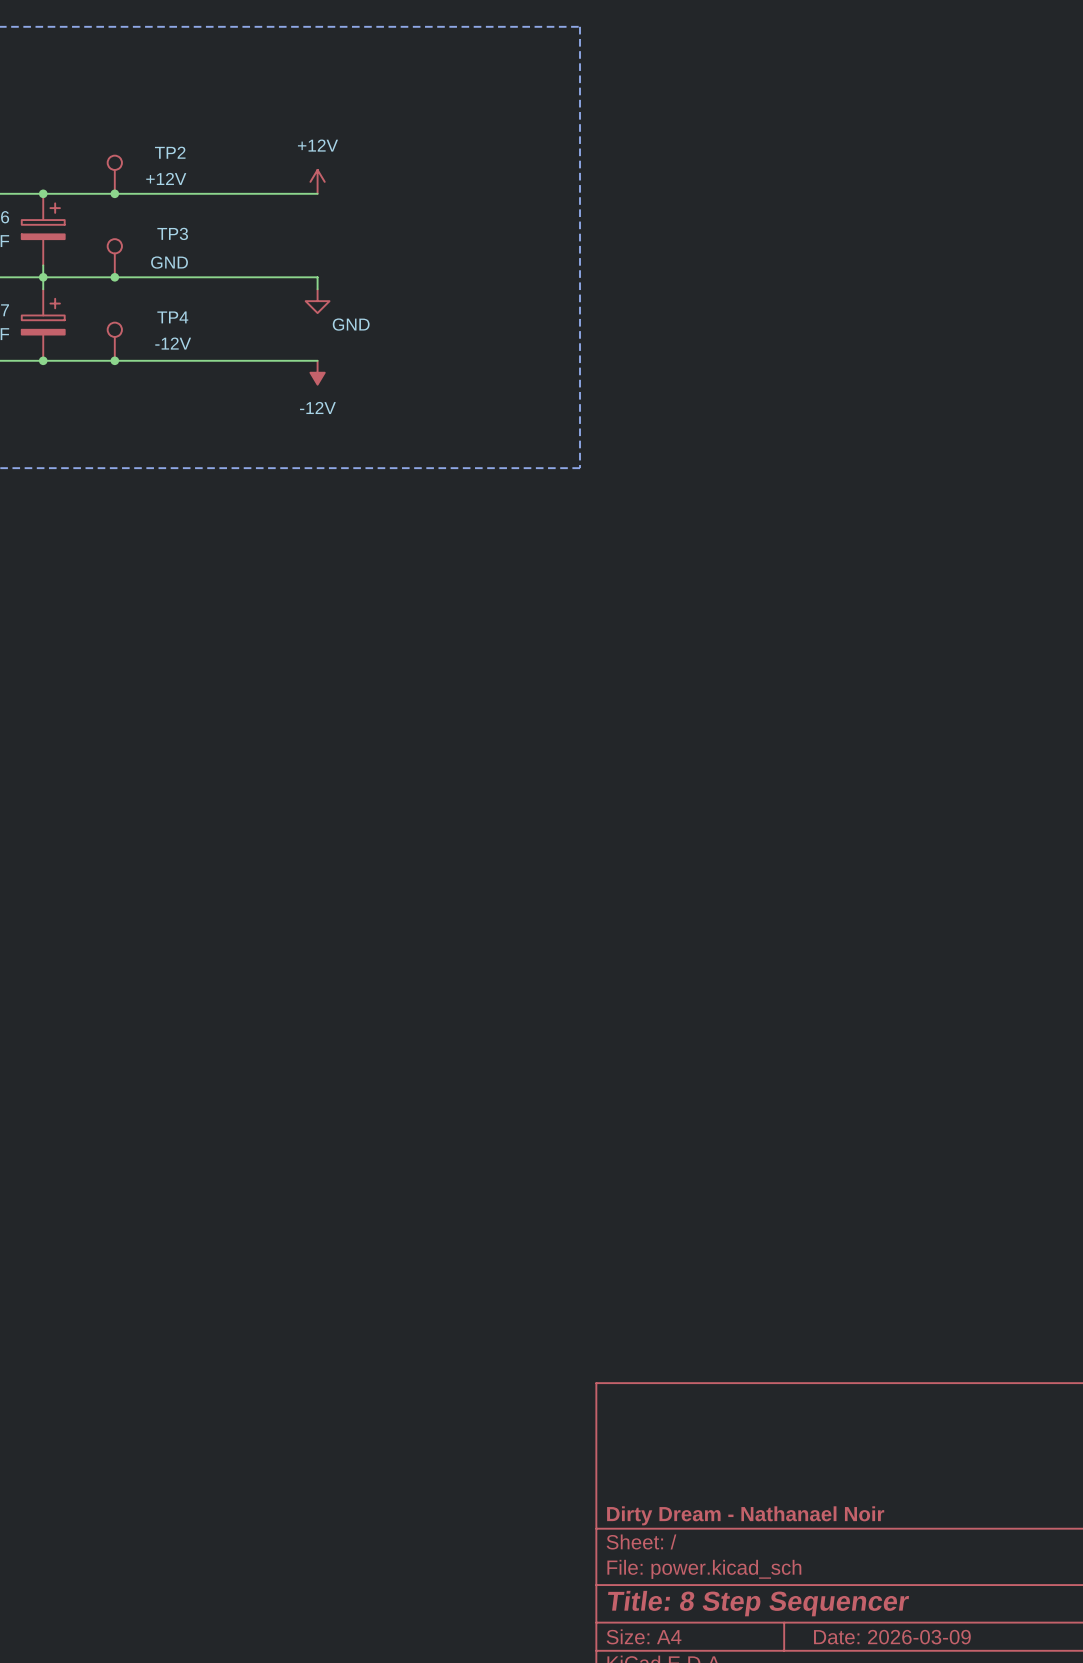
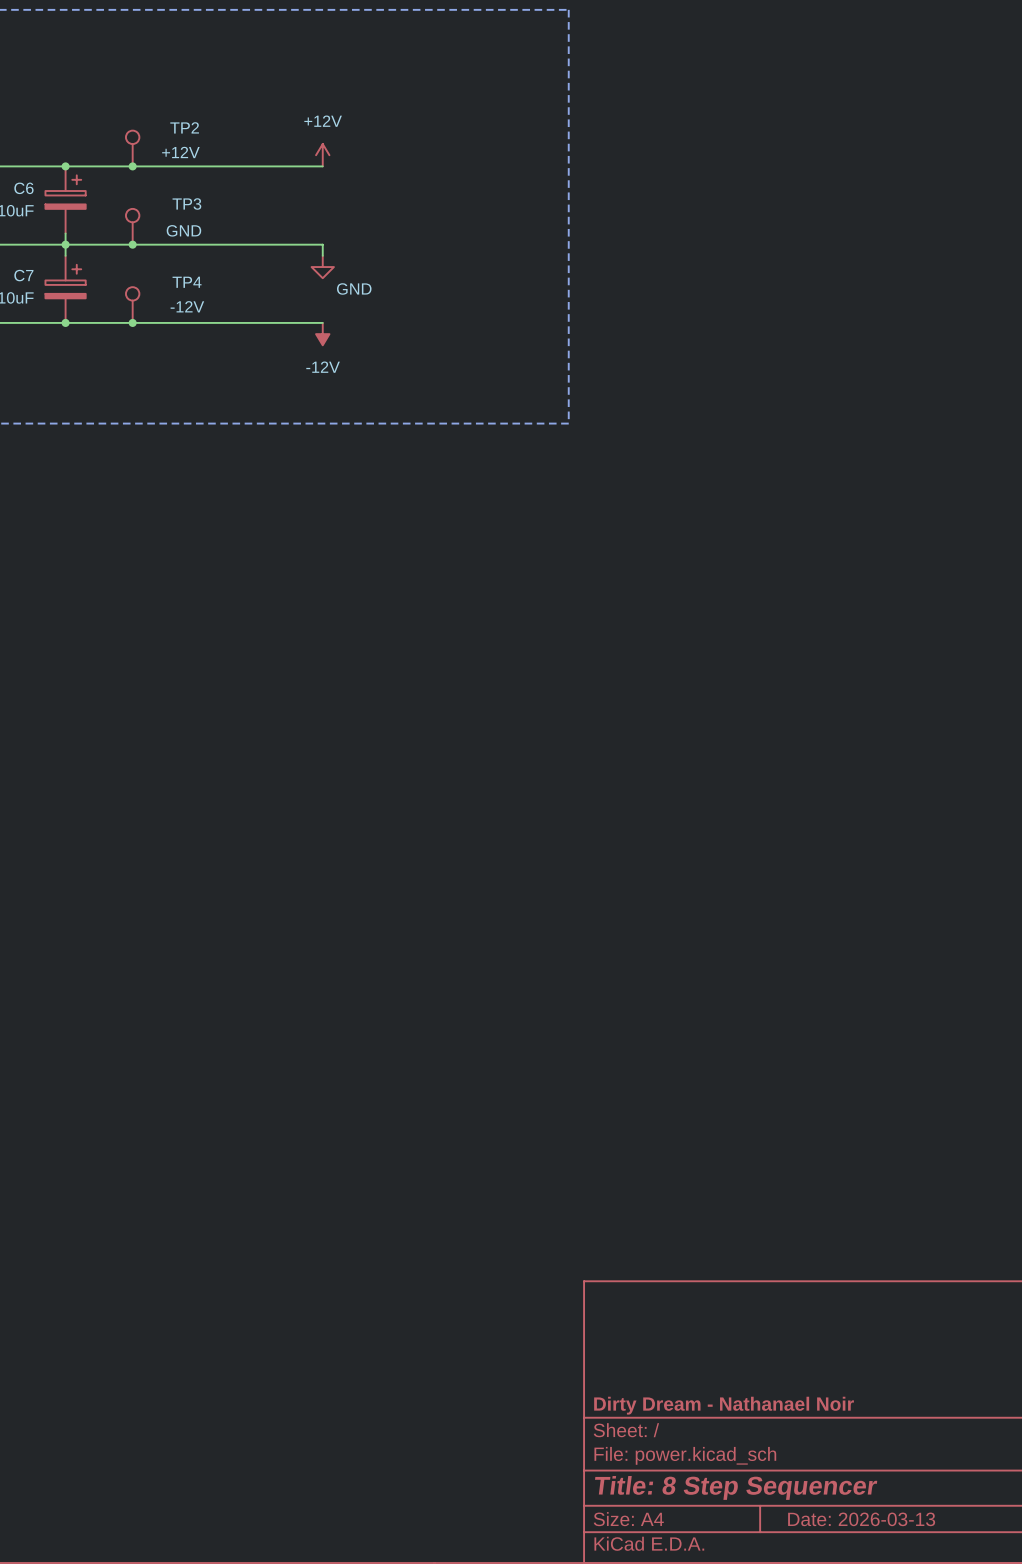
title block: Date: 2026-03-09 (892, 1637) -> Date: 2026-03-13 (861, 1519)

